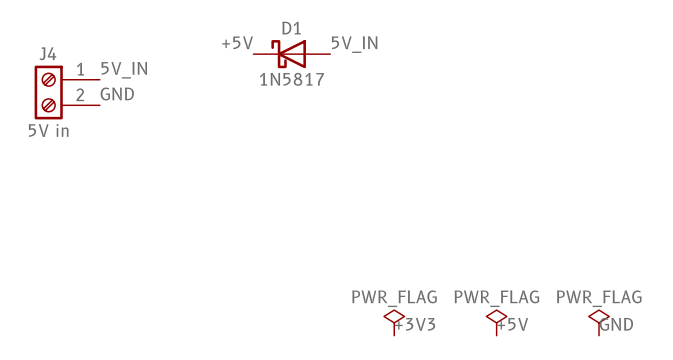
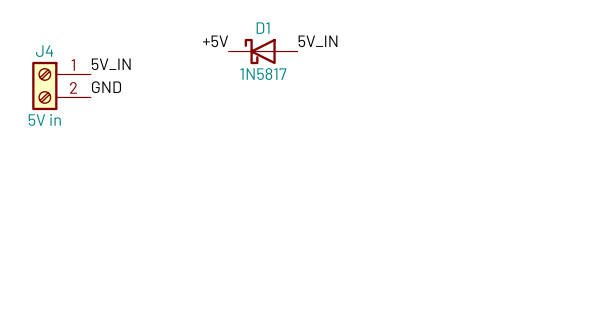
power symbol: PWR_FLAG (394, 322) -> none
power symbol: PWR_FLAG (496, 322) -> none
power symbol: PWR_FLAG (599, 322) -> none
label: +3V3 (415, 324) -> none
label: +5V (512, 324) -> none
label: GND (616, 324) -> none

